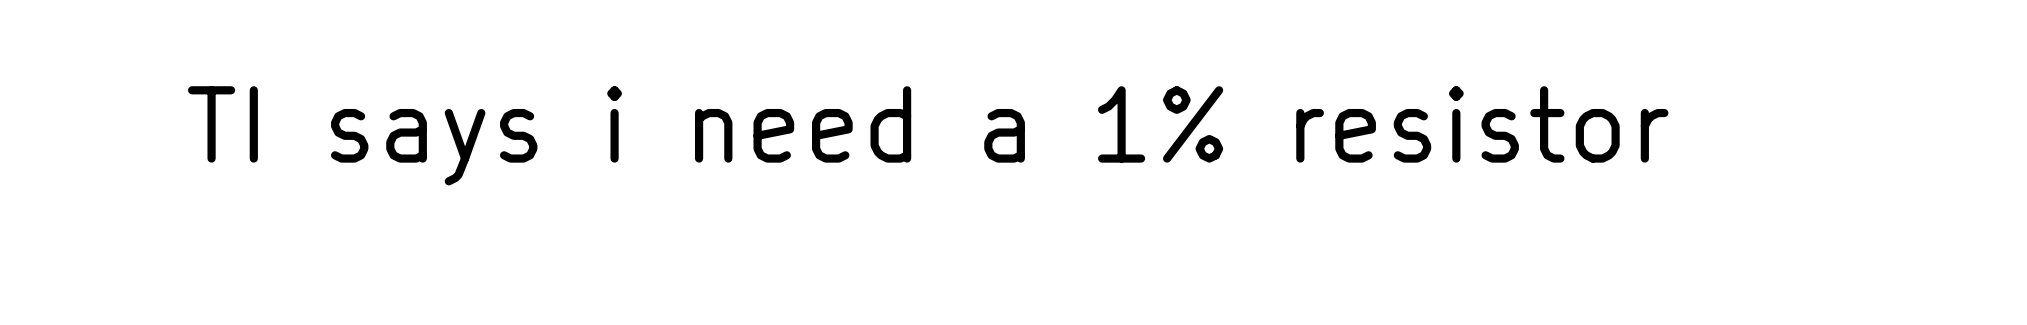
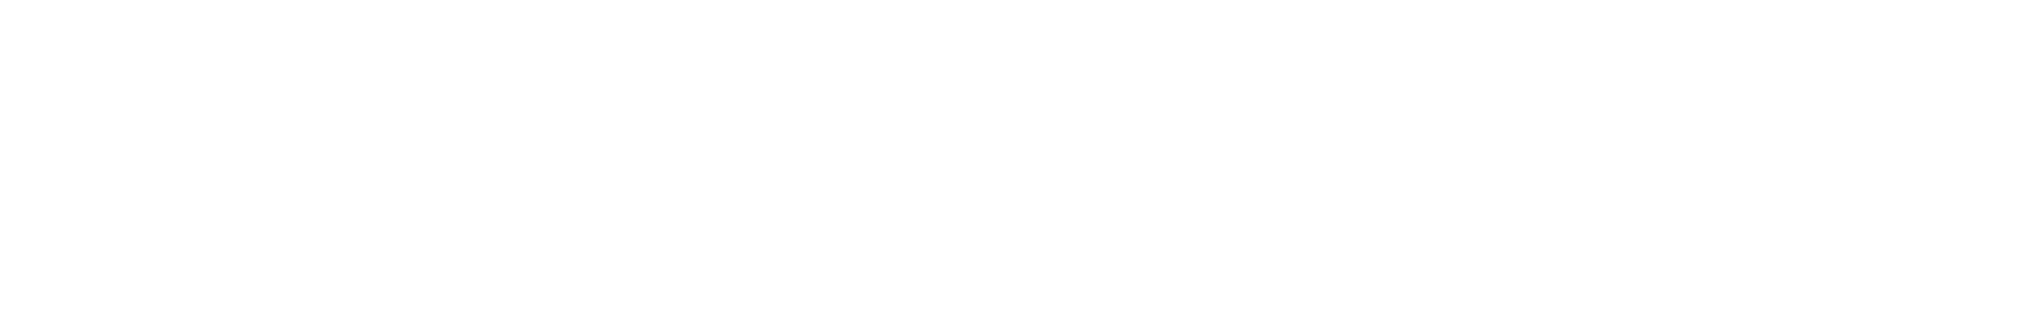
text: TI says i need a 1% resistor (928, 135) -> none

